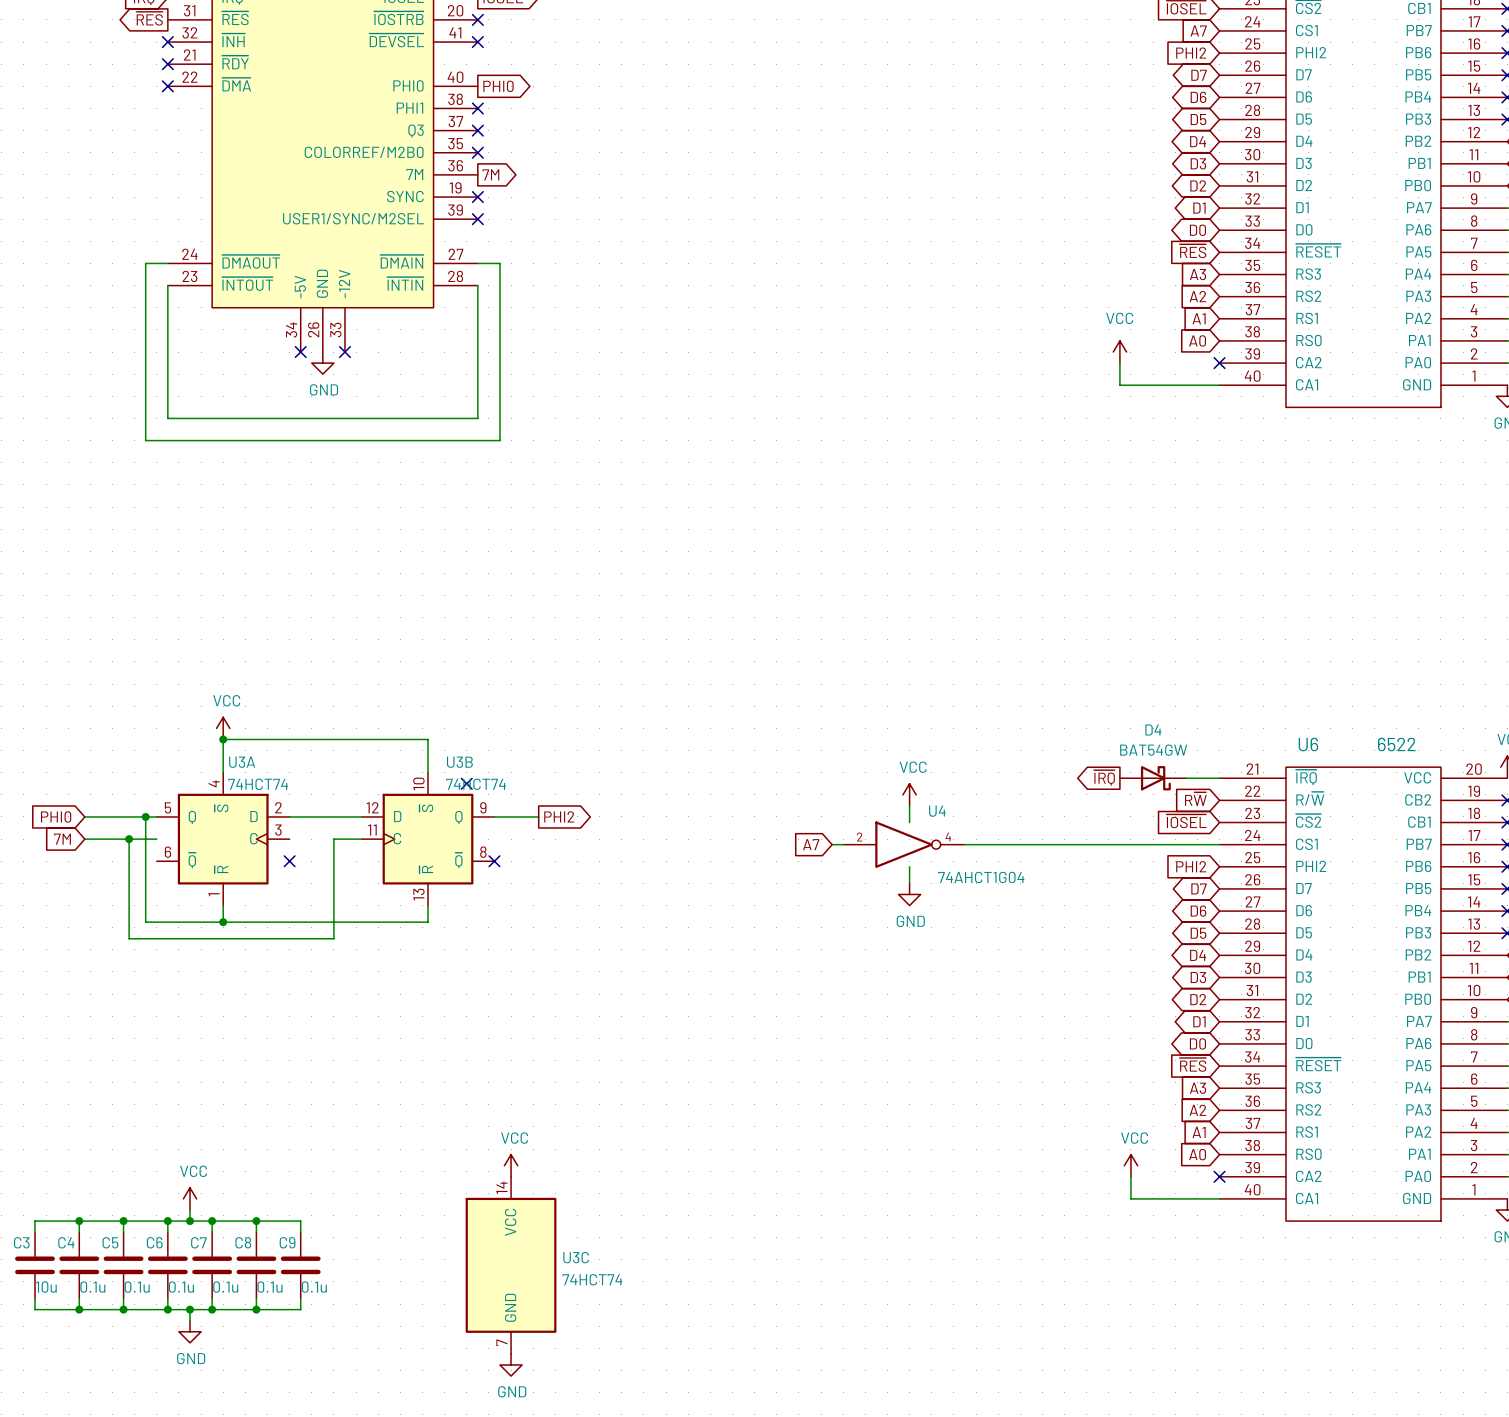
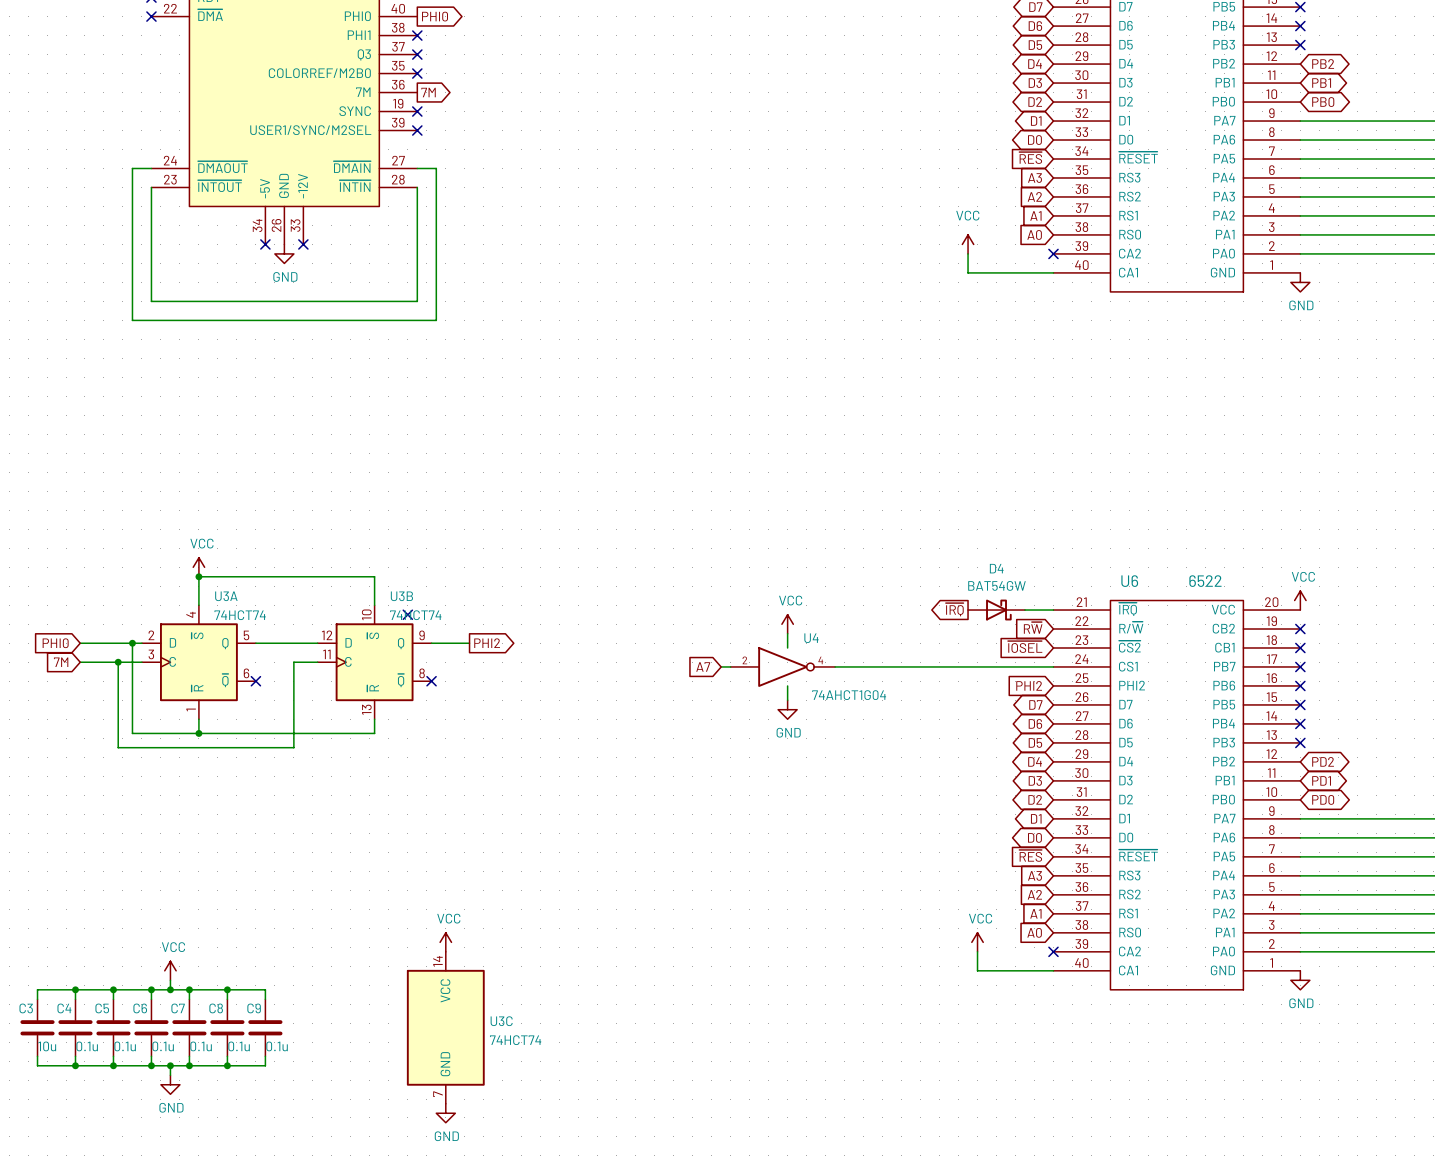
U3A flip: as is (223, 839) -> left-right (198, 662)

